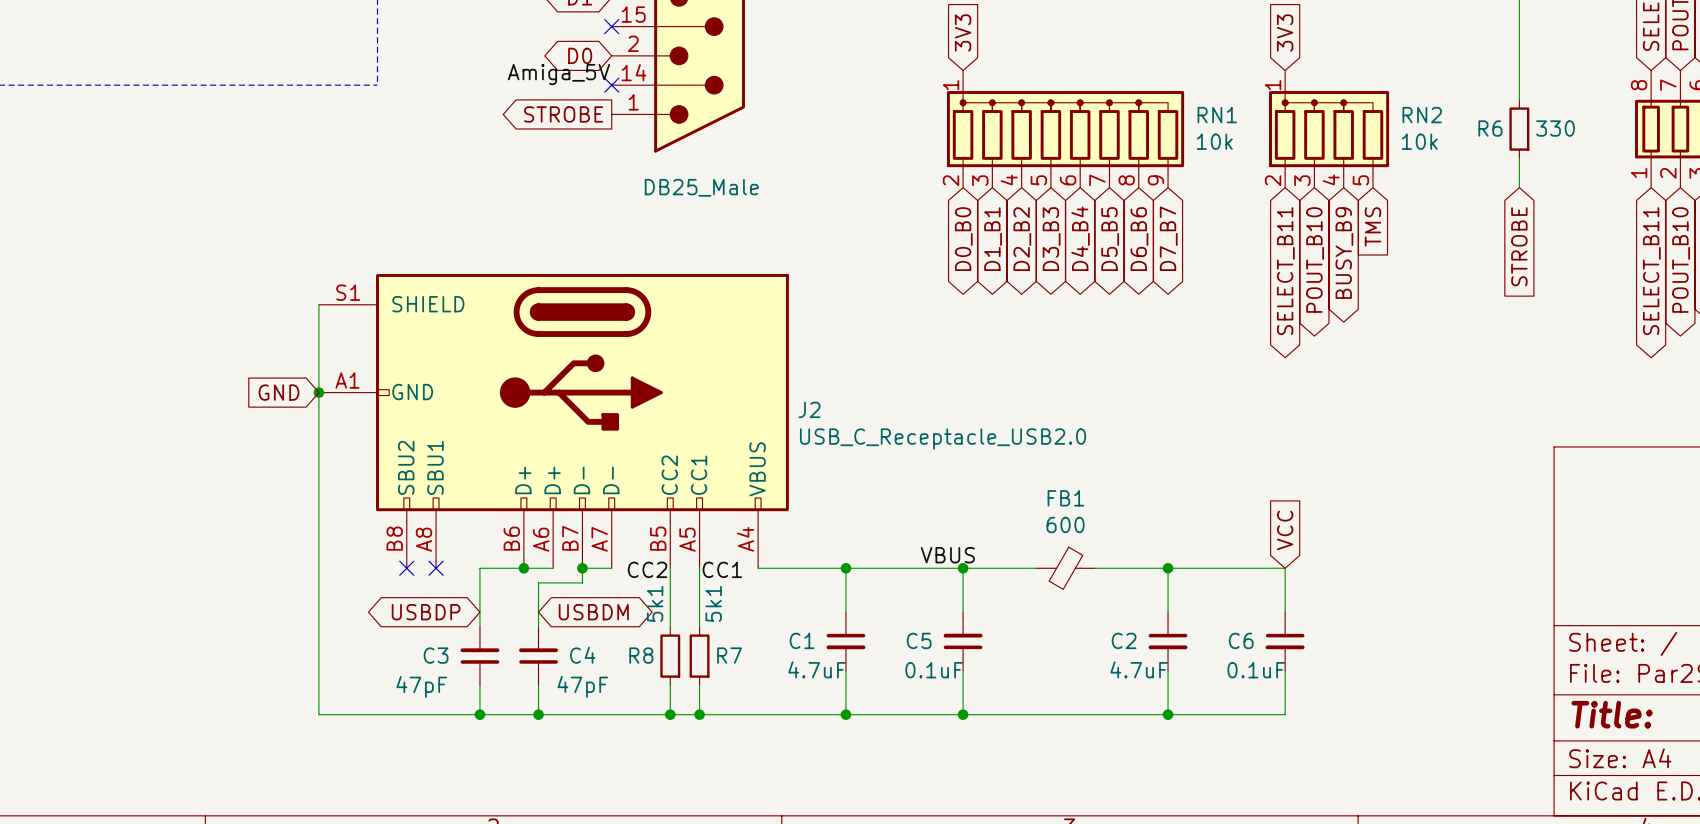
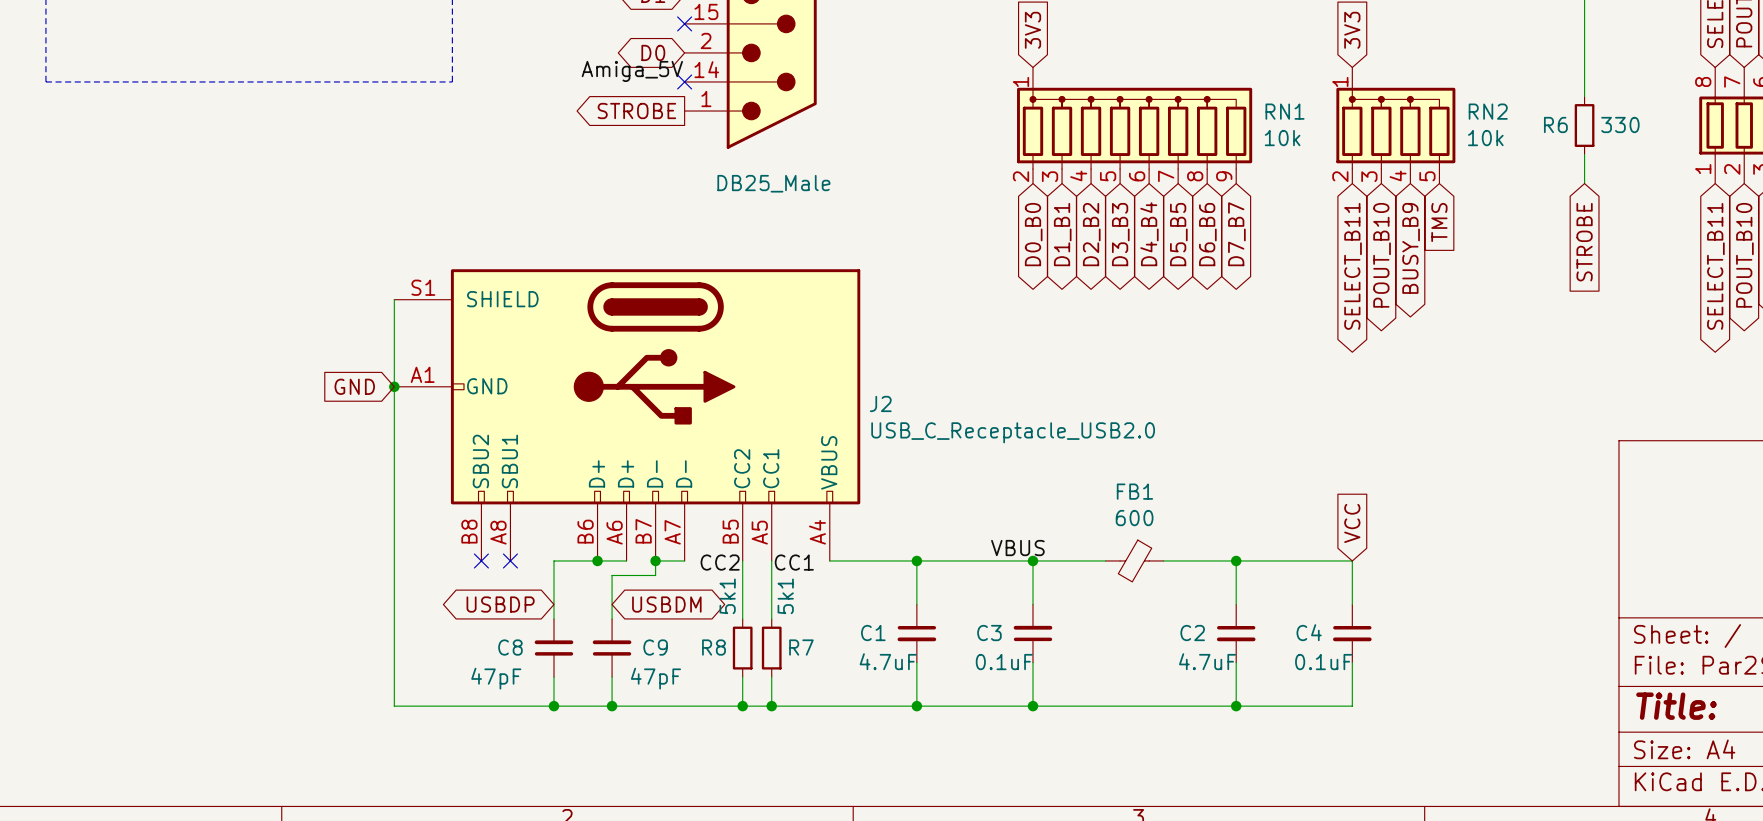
C5 name: C5 (919, 640) -> C3 (989, 633)
C6 name: C6 (1241, 640) -> C4 (1309, 632)
C3 name: C3 (436, 655) -> C8 (510, 647)
C4 name: C4 (582, 655) -> C9 (655, 647)

